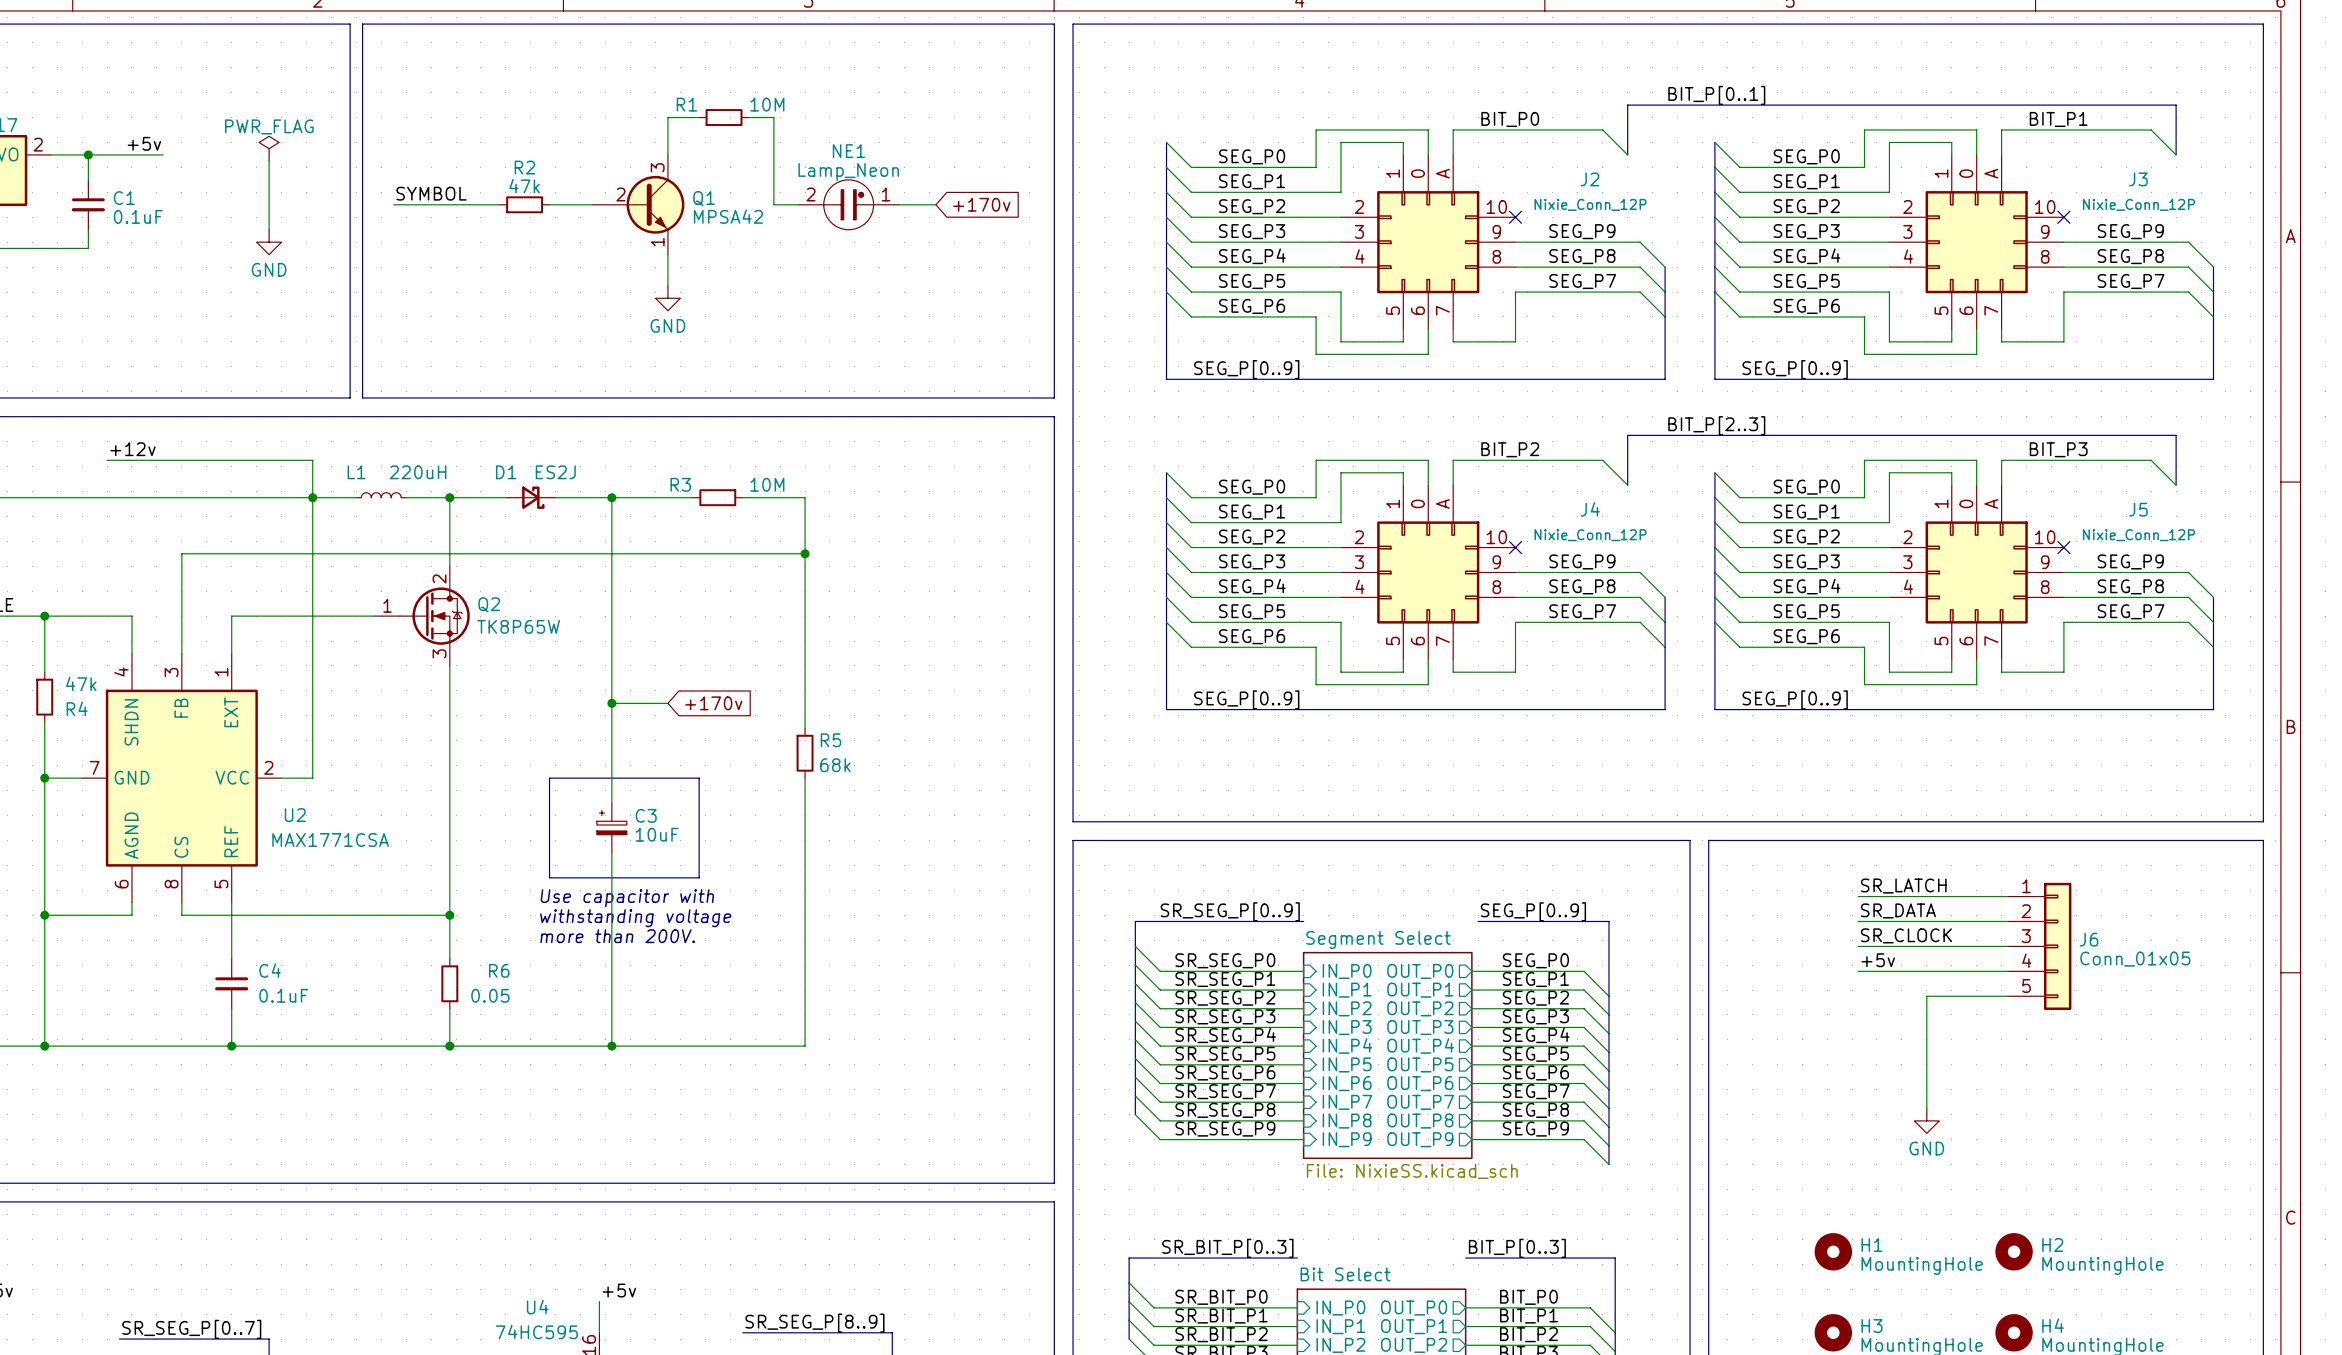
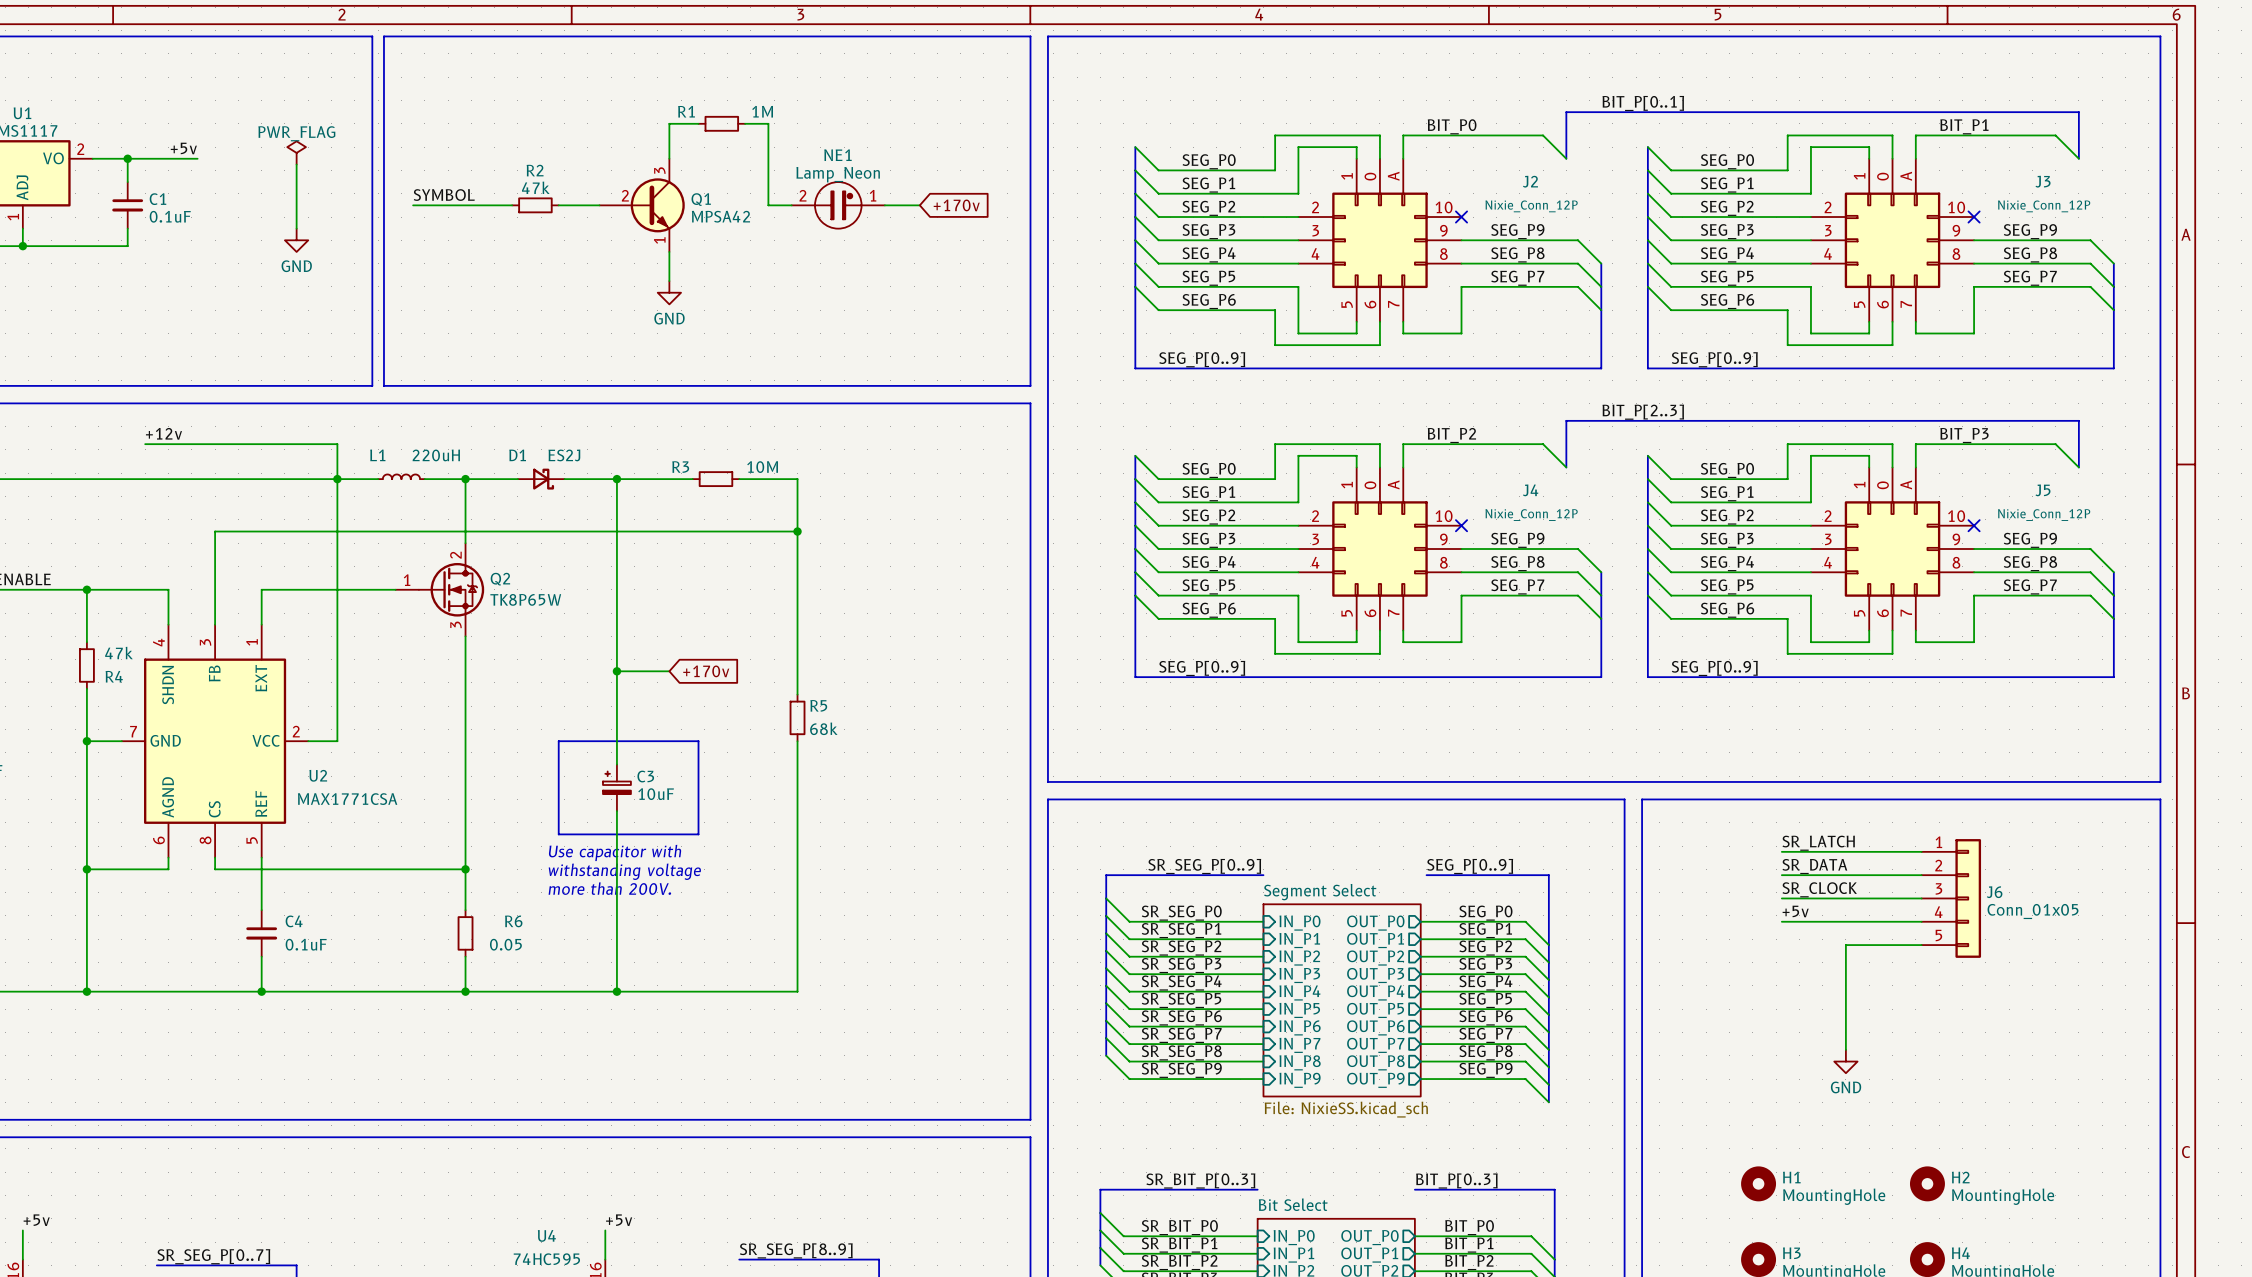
R1 value: 10M (767, 104) -> 1M (762, 111)

